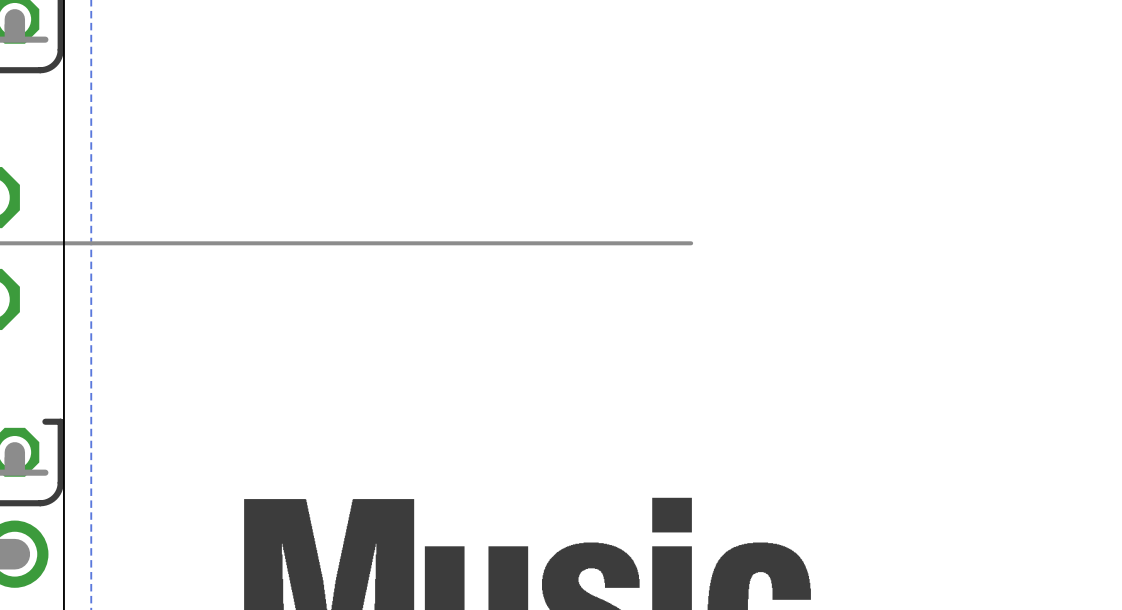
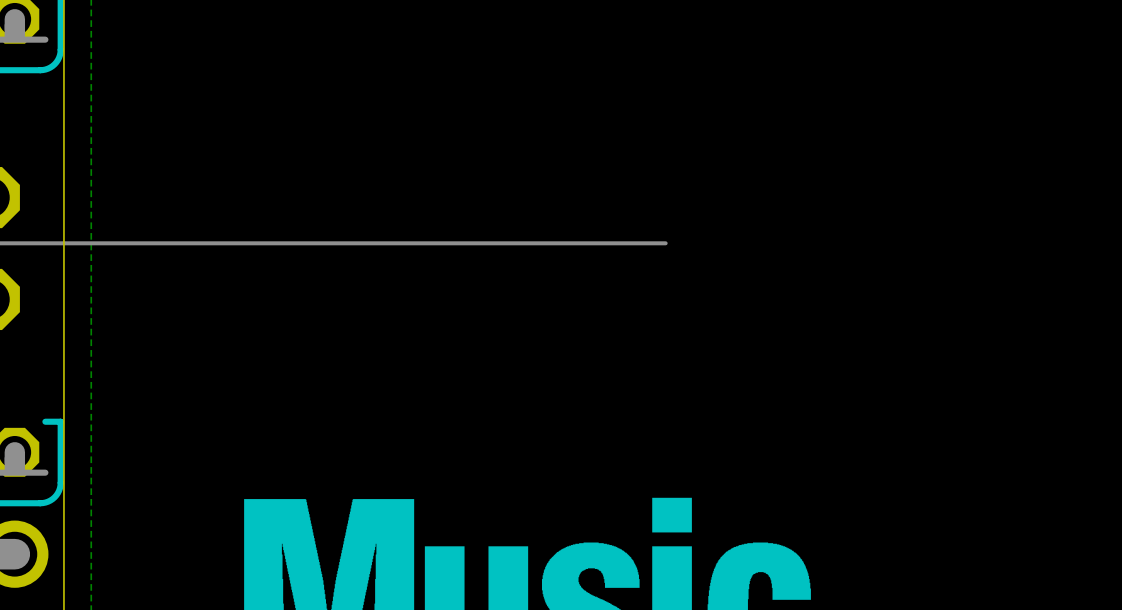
line: (665, 243) (691, 243) -> none

